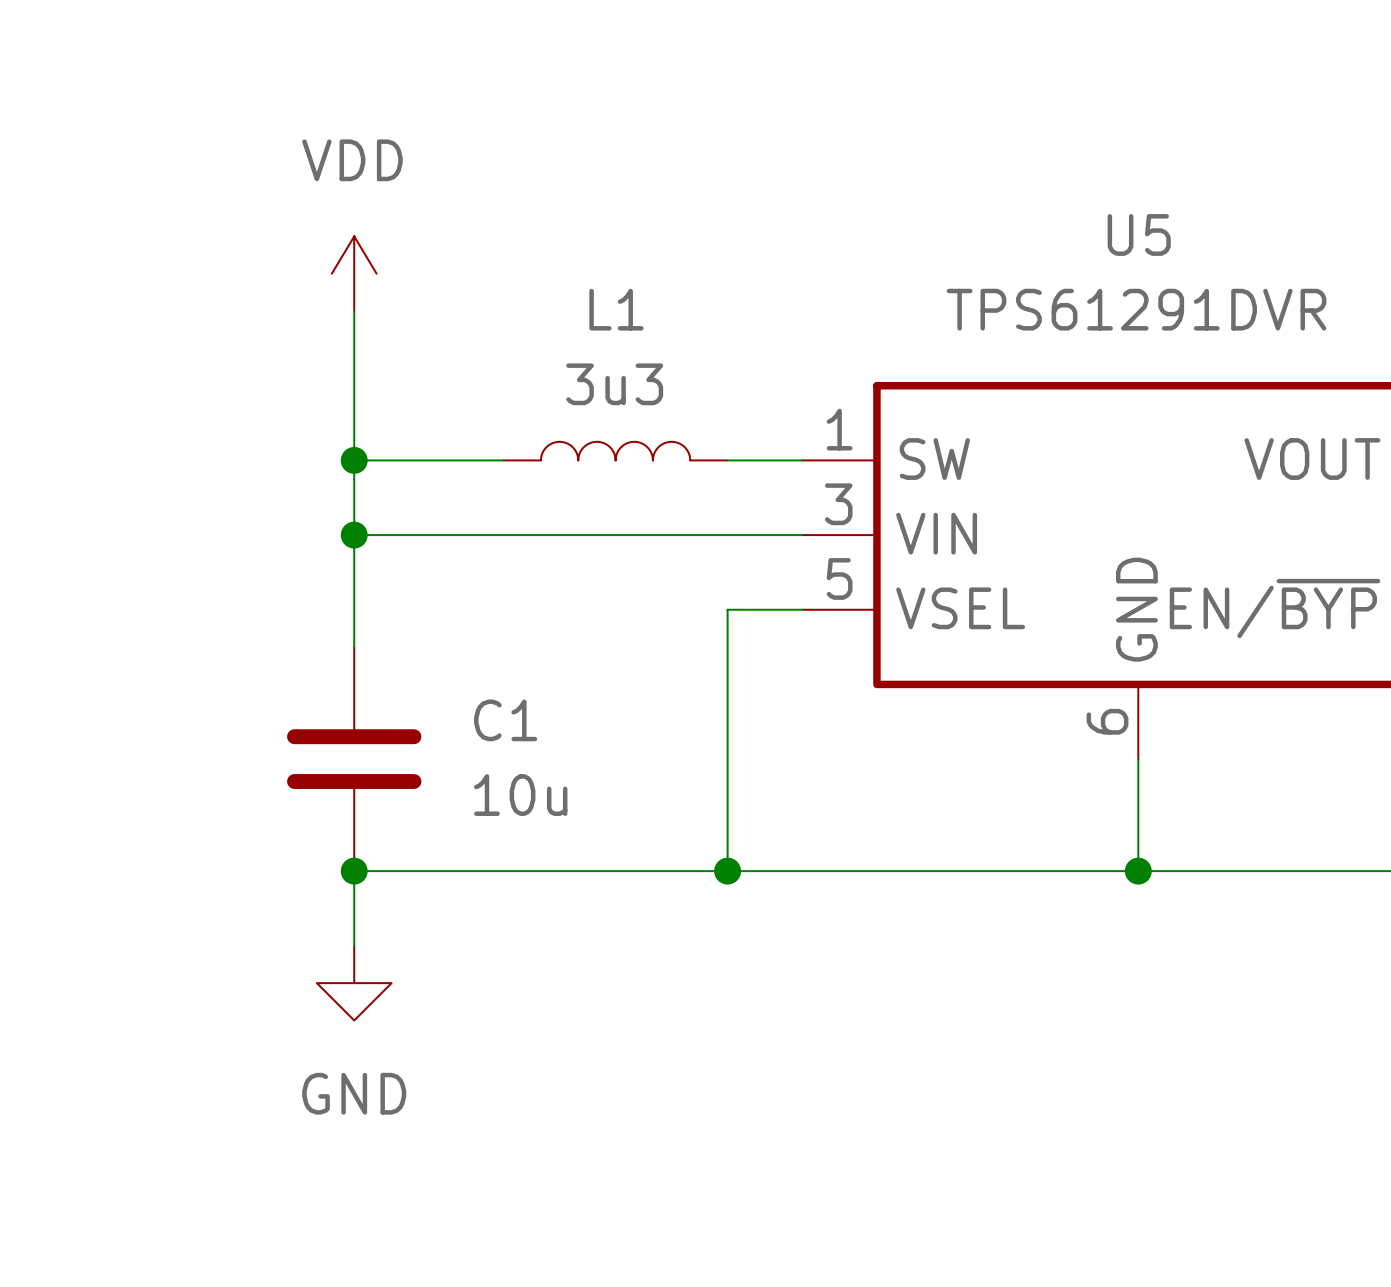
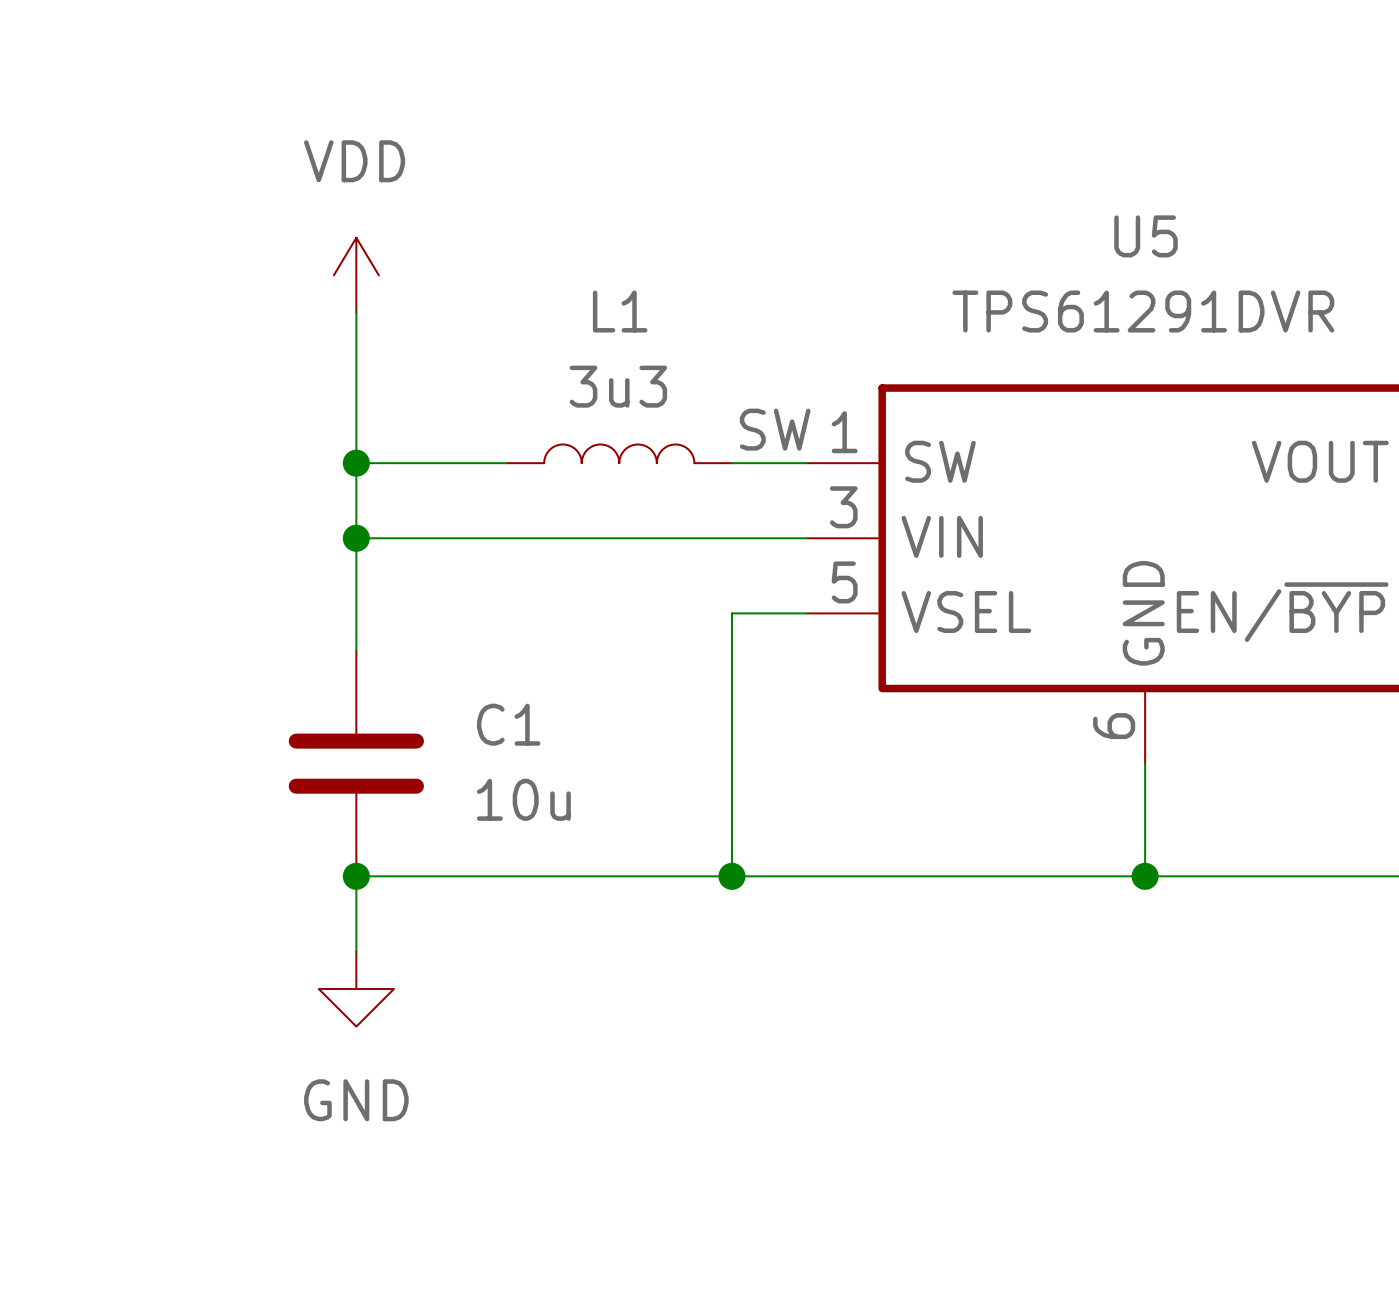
label: none -> SW (775, 429)

